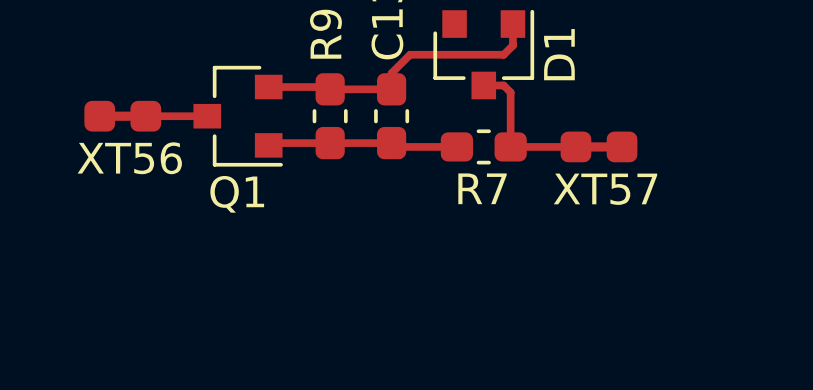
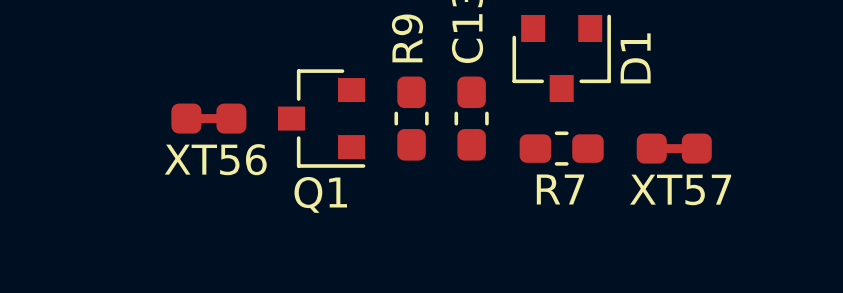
top track: (512, 24) (512, 45) (503, 54) (410, 54) (391, 73) (391, 89) (268, 87) -> none
top track: (483, 85) (503, 85) (510, 92) (510, 146) (575, 146) -> none
top track: (145, 116) (207, 116) -> none
top track: (268, 145) (271, 143) (391, 143) (395, 146) (456, 146) -> none

